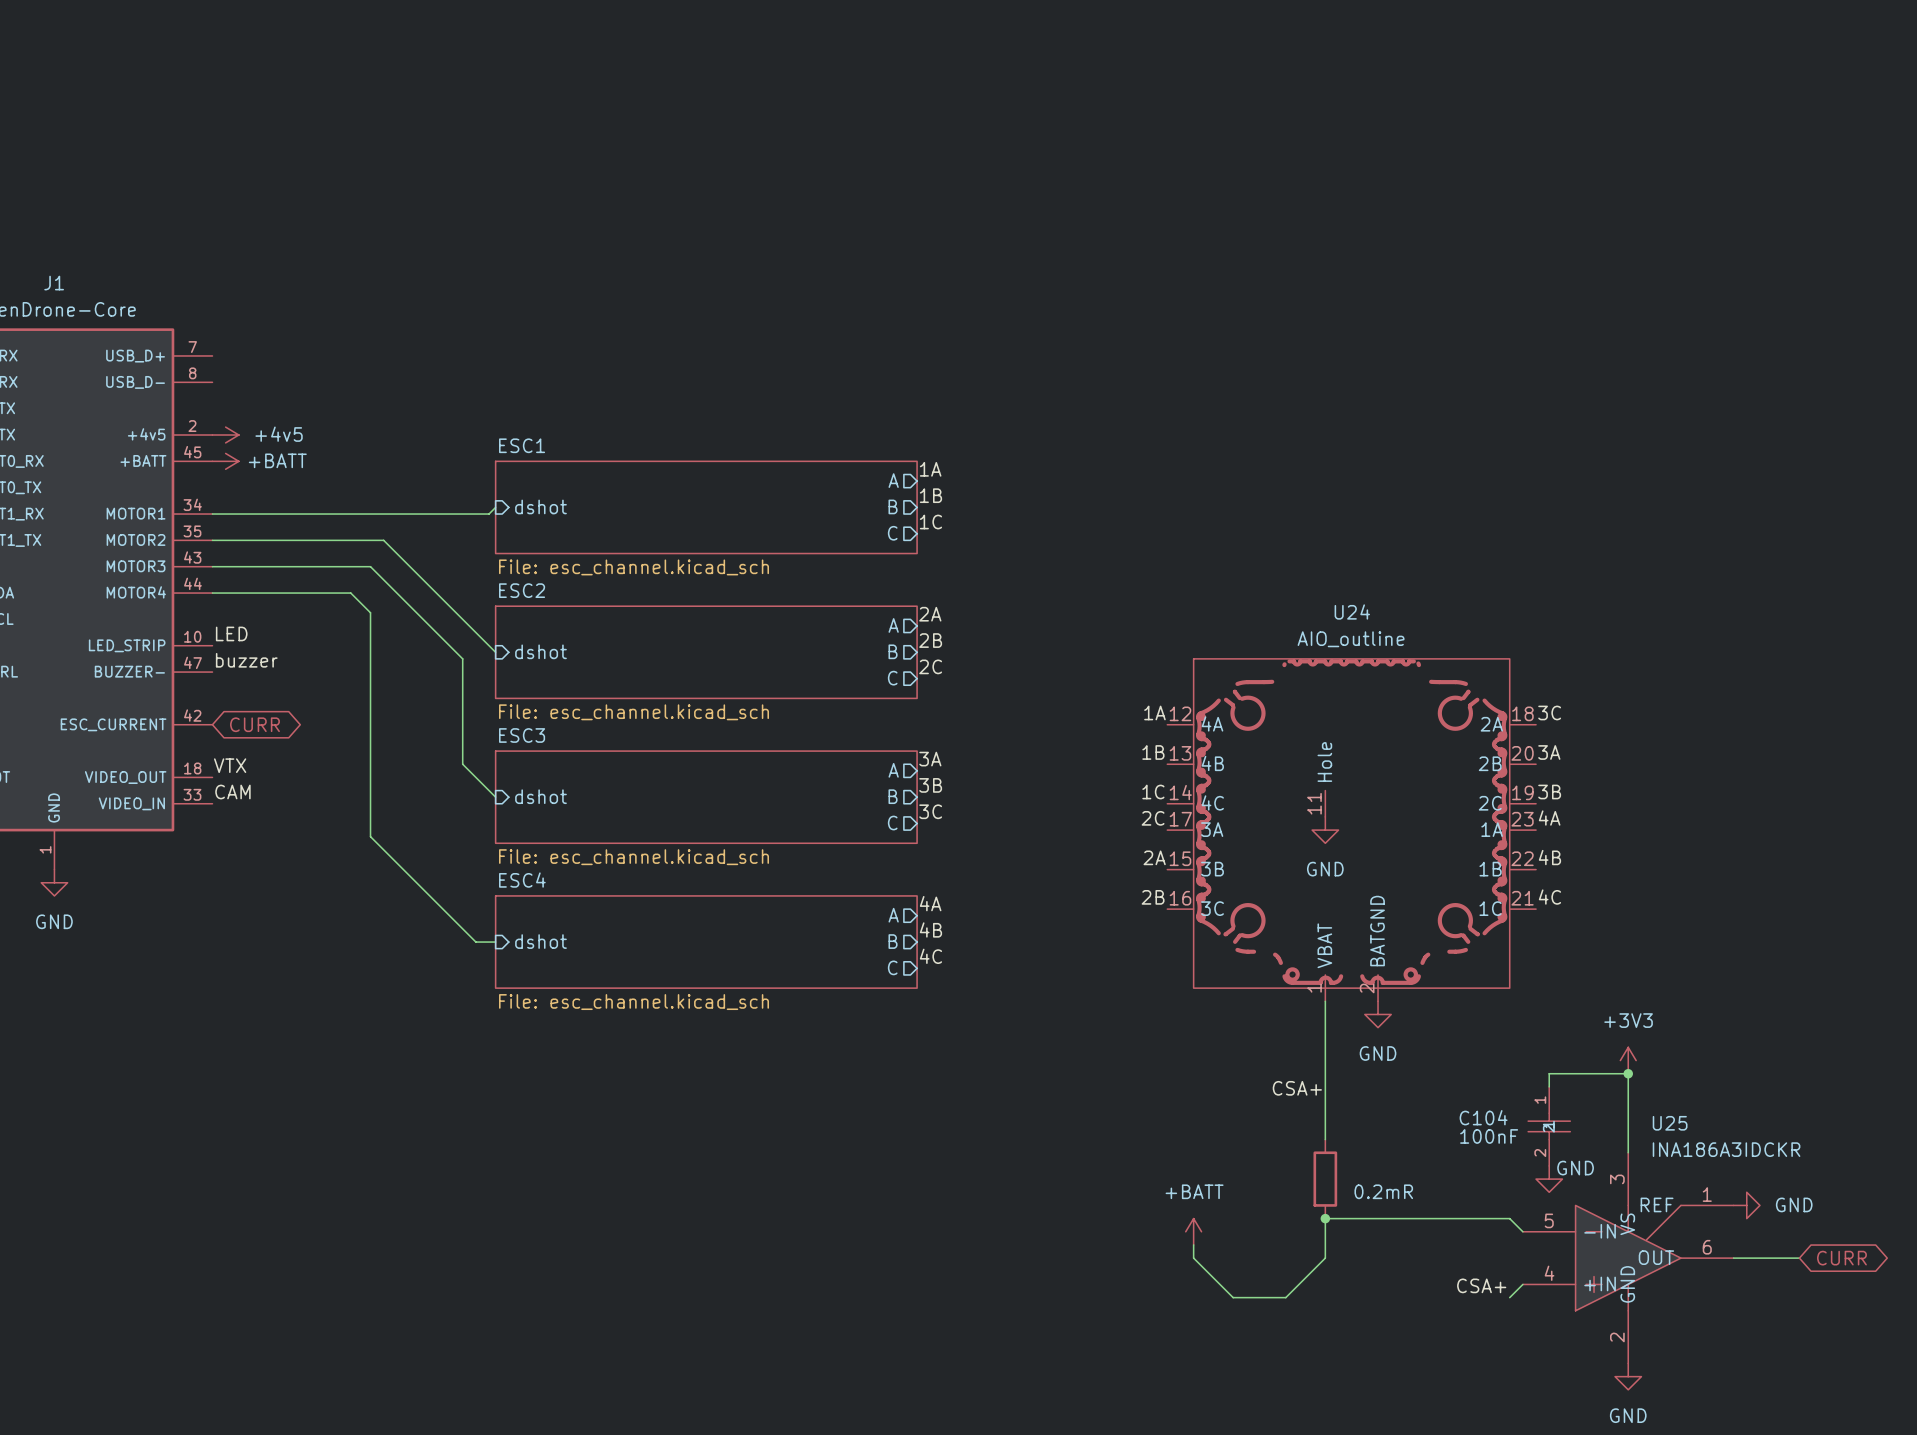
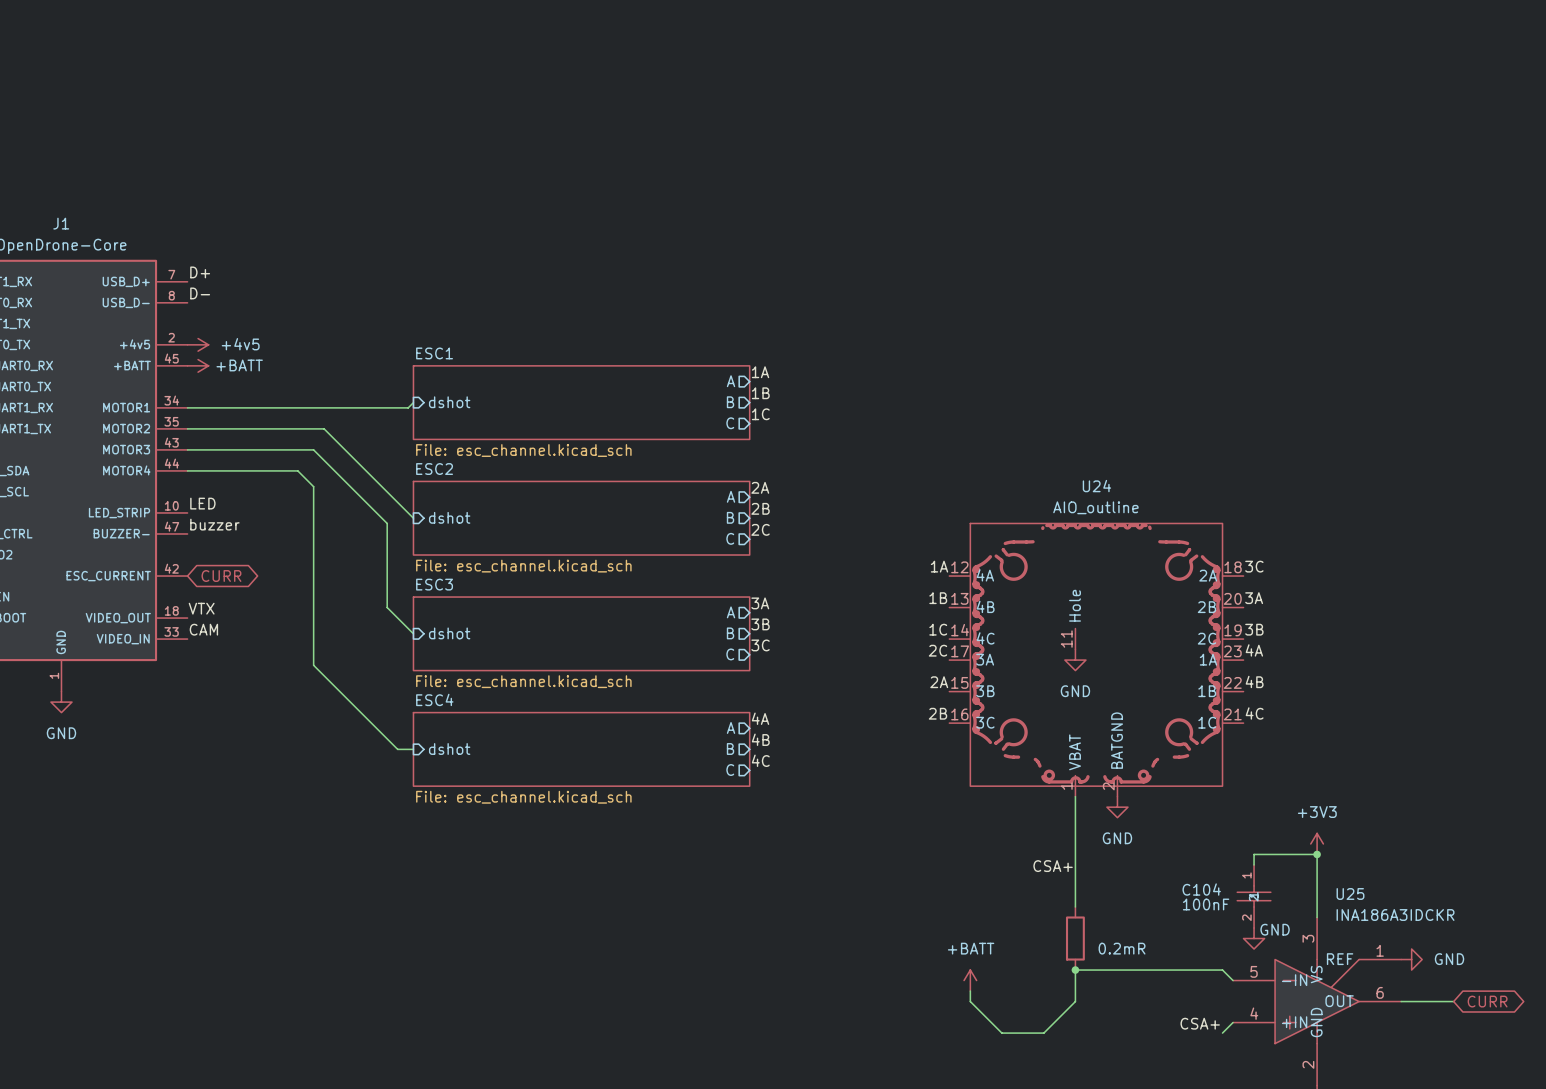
label: none -> D+ (200, 272)
label: none -> D- (200, 293)

